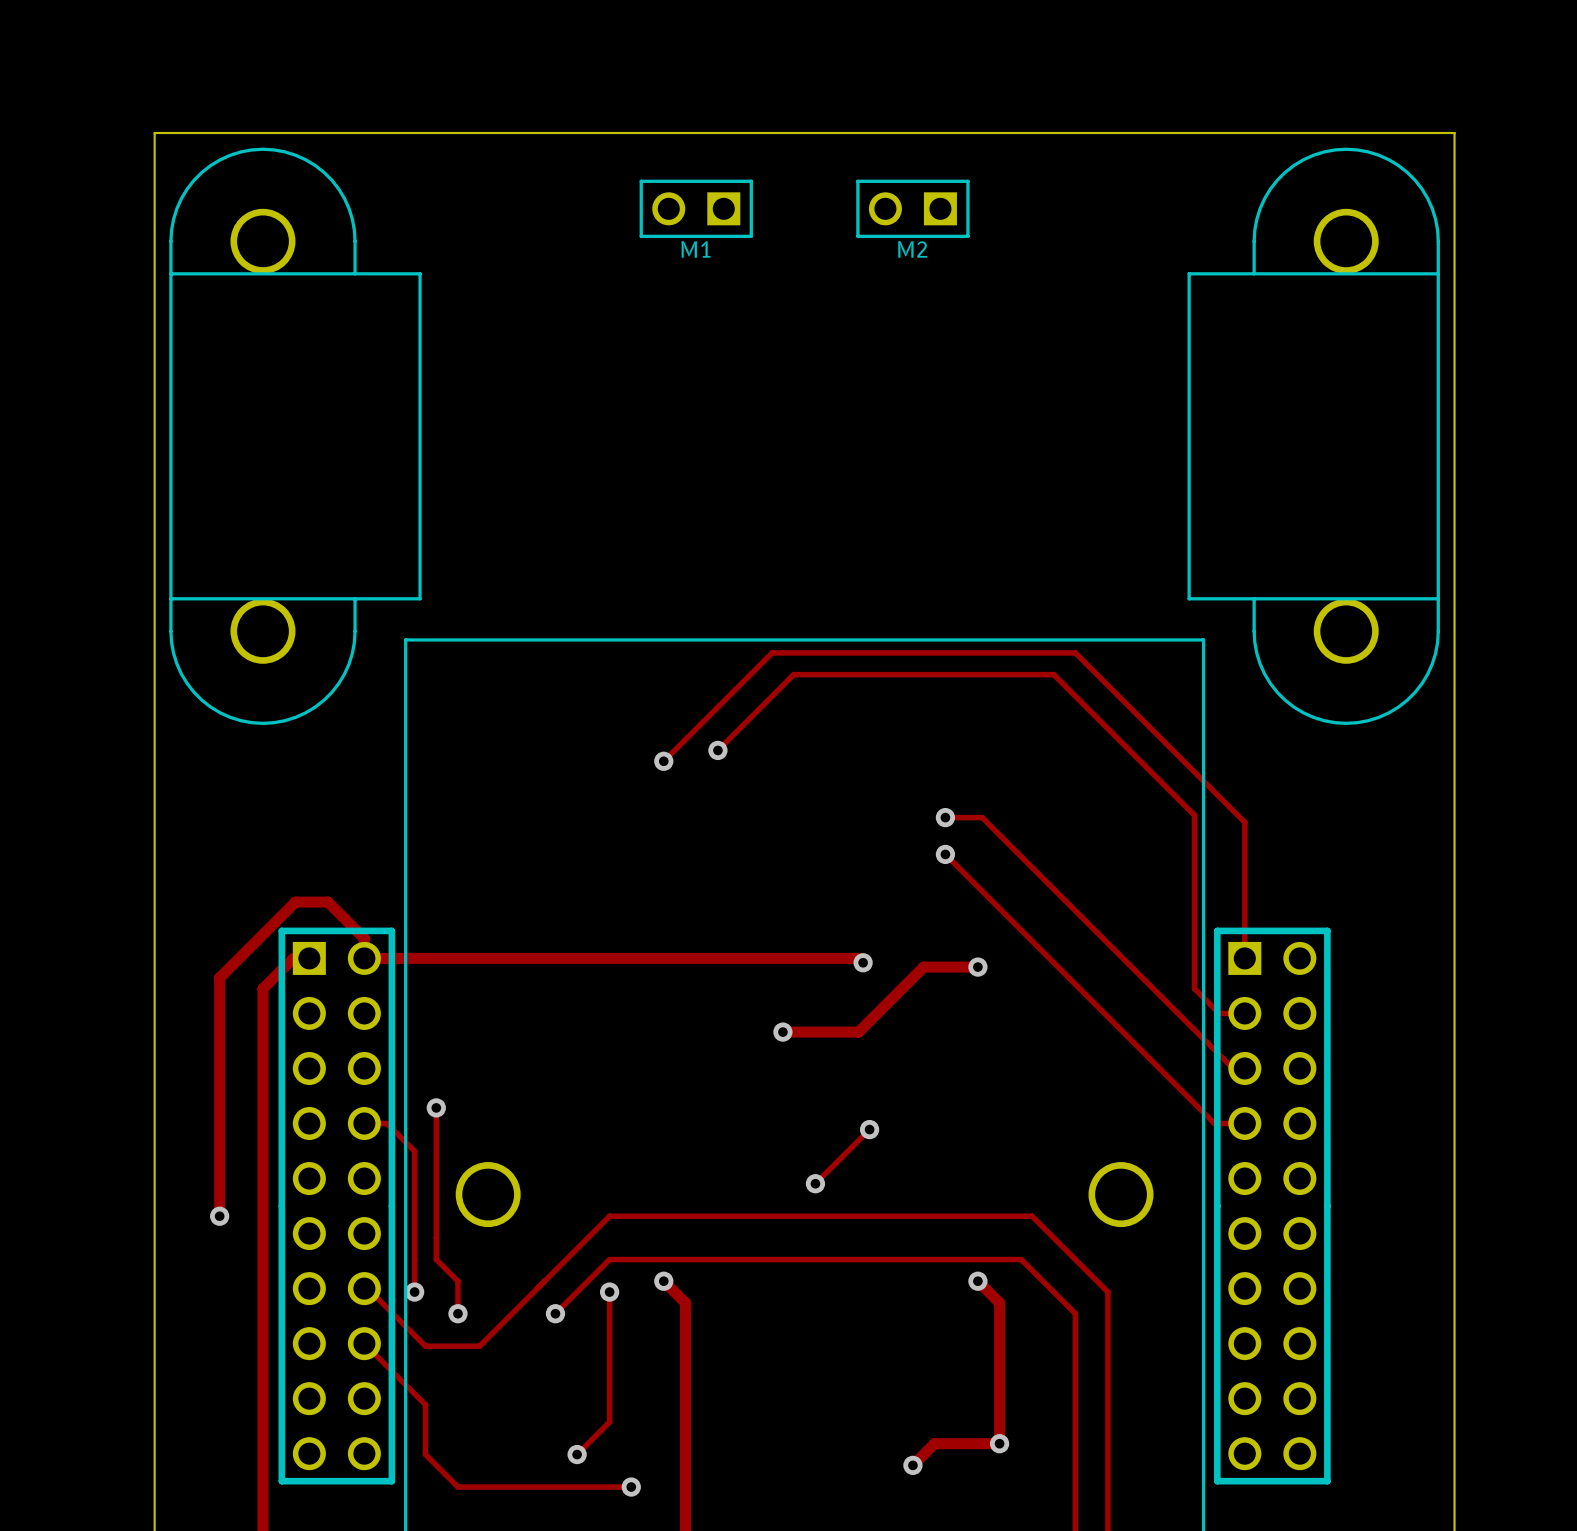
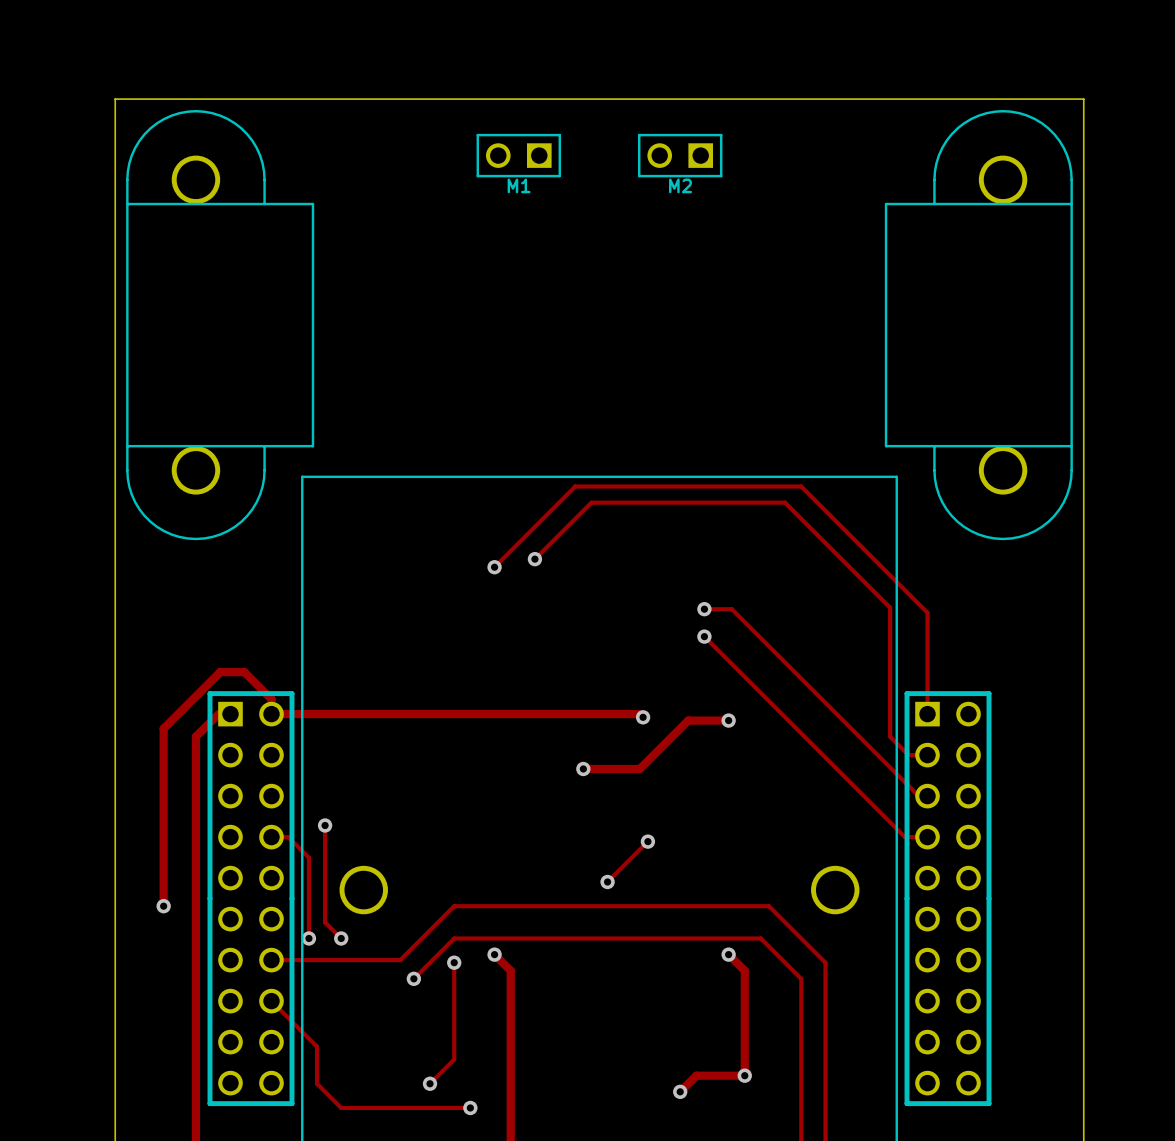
track: (436, 1237) (436, 1259) (457, 1281) (457, 1313) -> (325, 922) (341, 938)
track: (414, 1259) (414, 1292) -> none
via: none -> (308, 938)
via: none -> (341, 938)
track: (367, 1288) (425, 1346) (479, 1346) (537, 1288) -> (274, 960) (400, 960)
via: (414, 1292) -> none
via: (457, 1313) -> none

